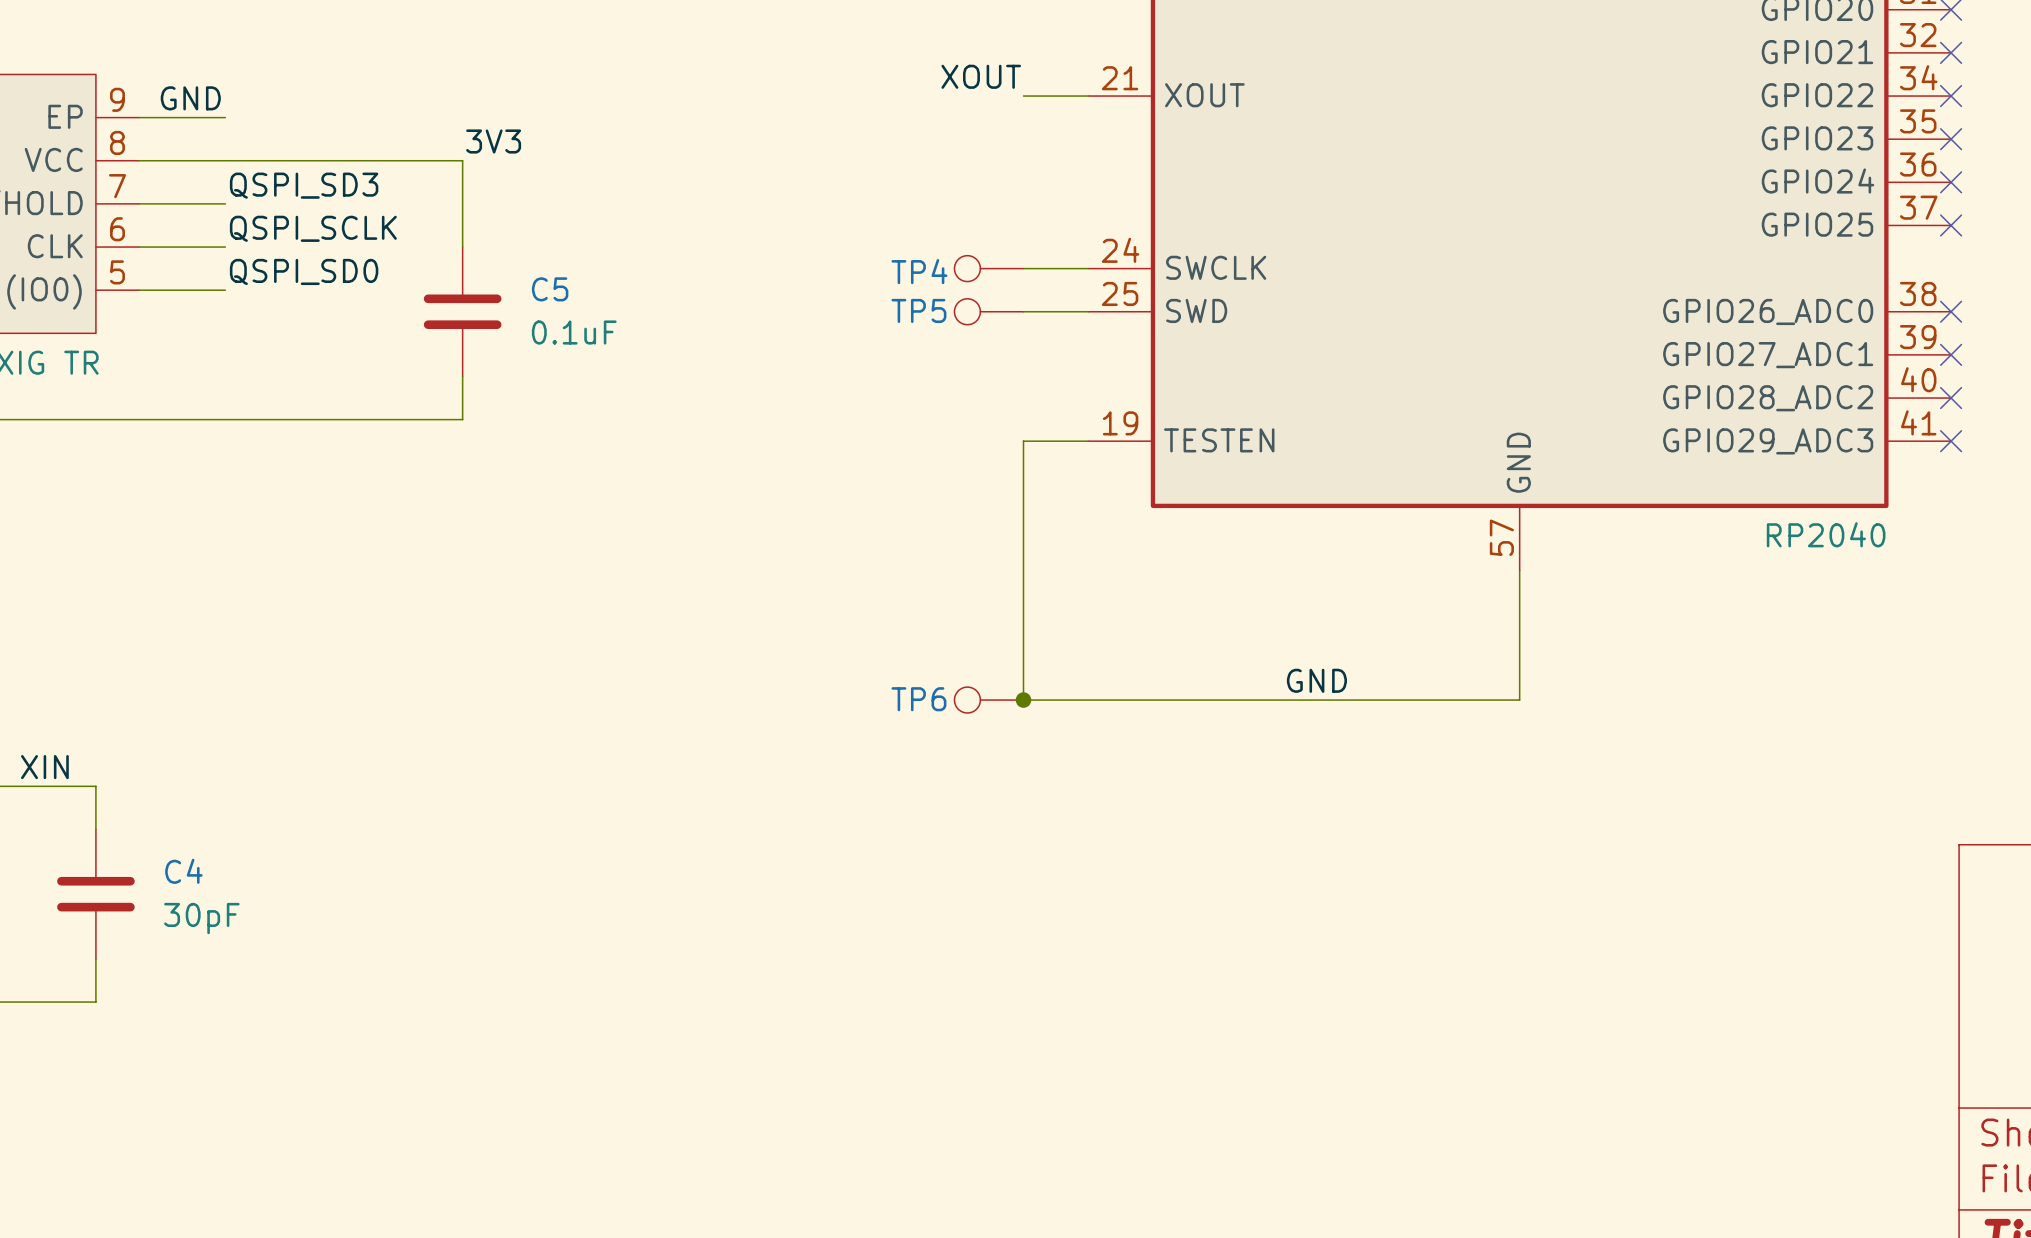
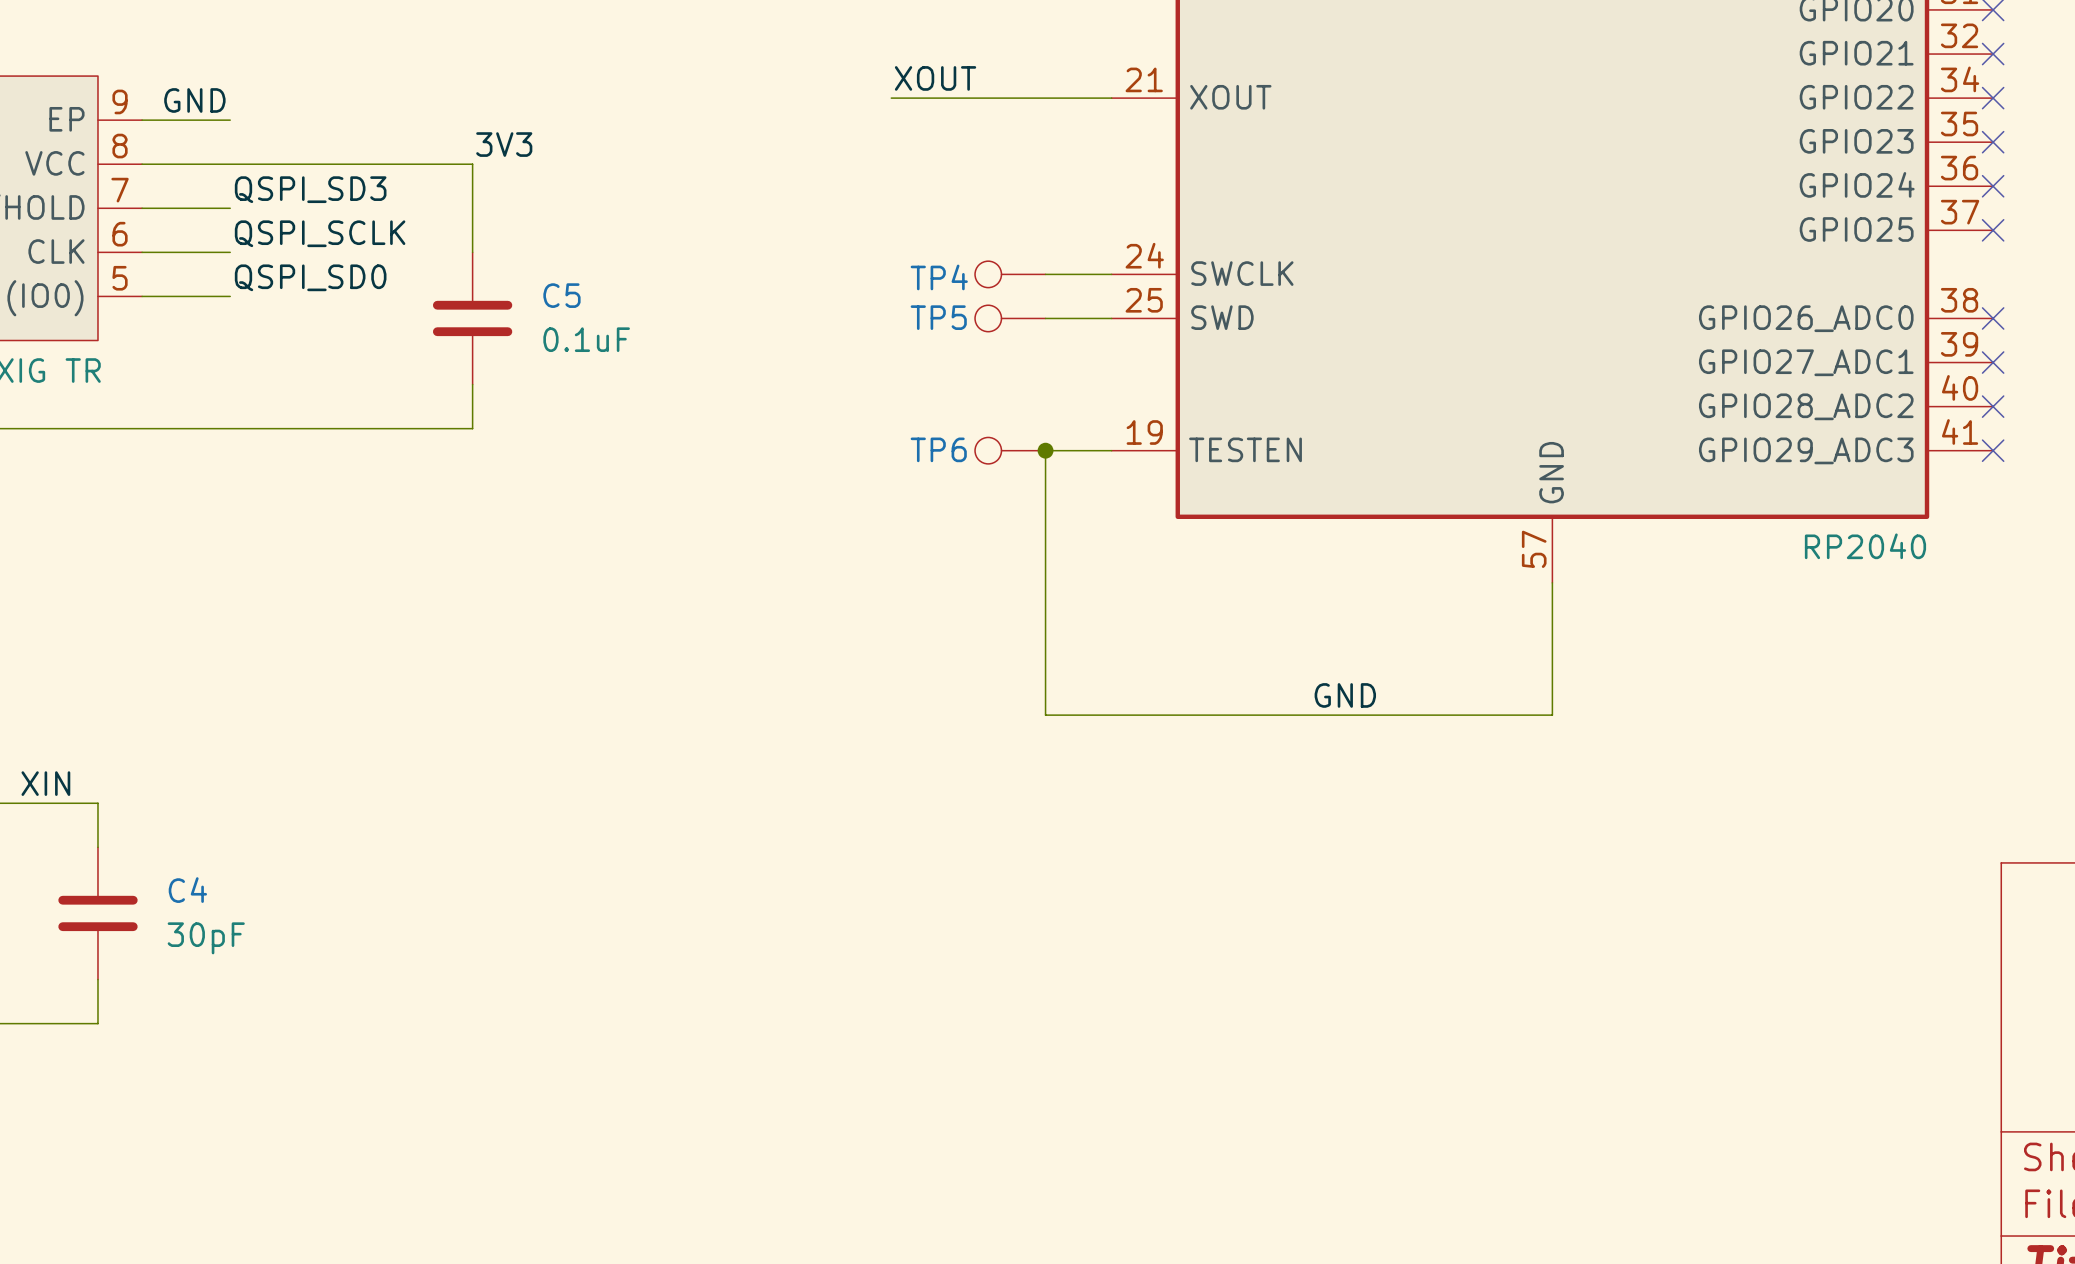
label position: XOUT (981, 76) -> XOUT (935, 78)
wire: none -> (891, 98) (1045, 98)
junction: none -> (1045, 450)
TP6 position: (988, 700) -> (1010, 450)
junction: (1023, 700) -> none

